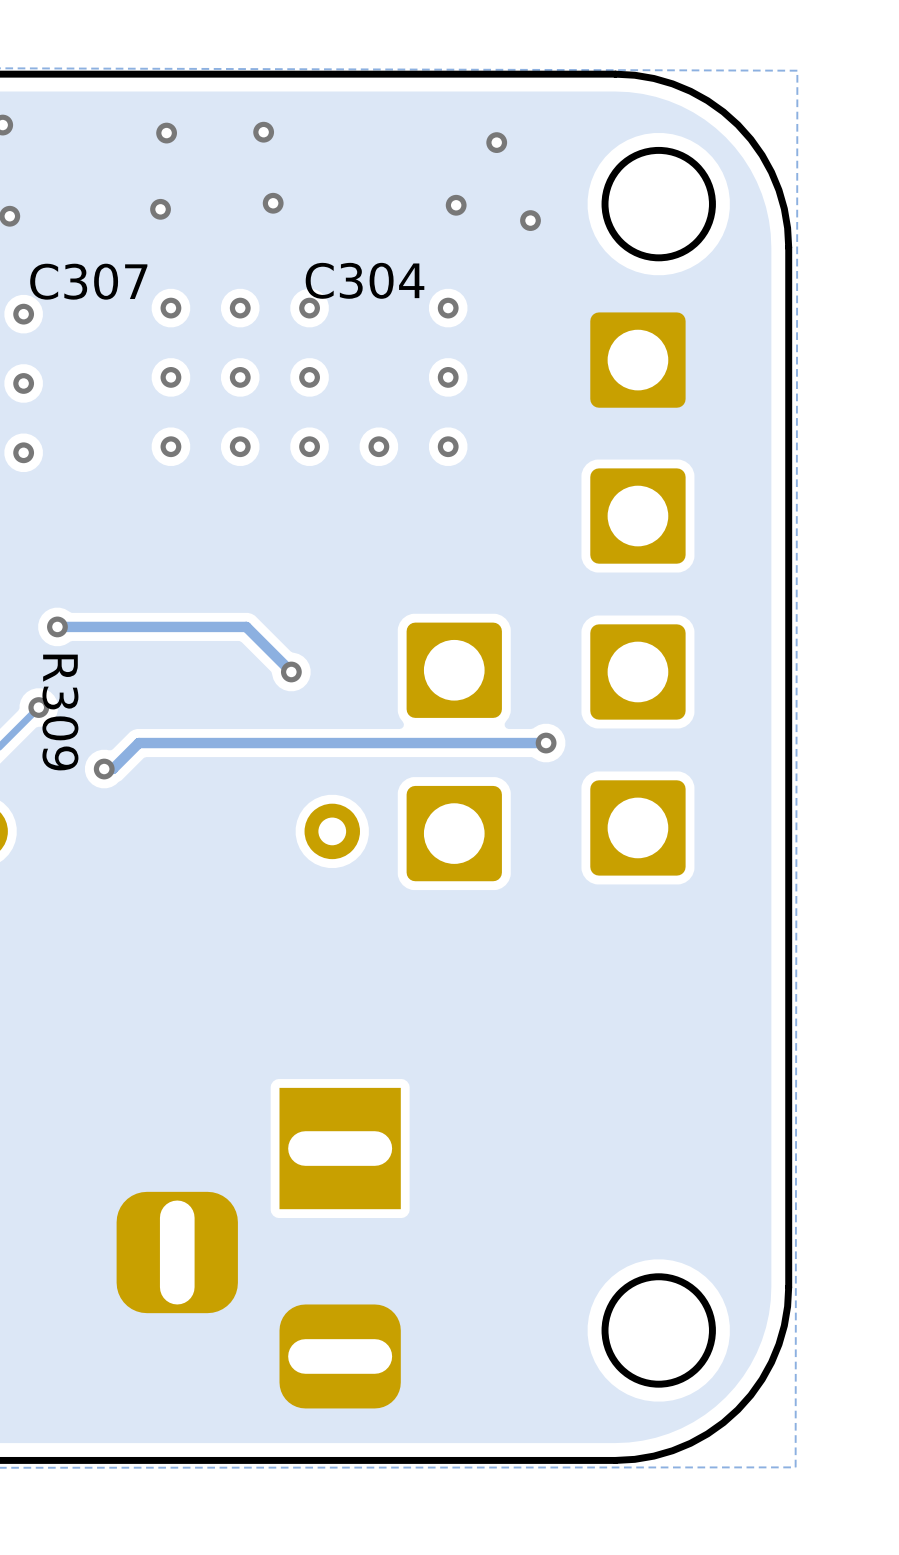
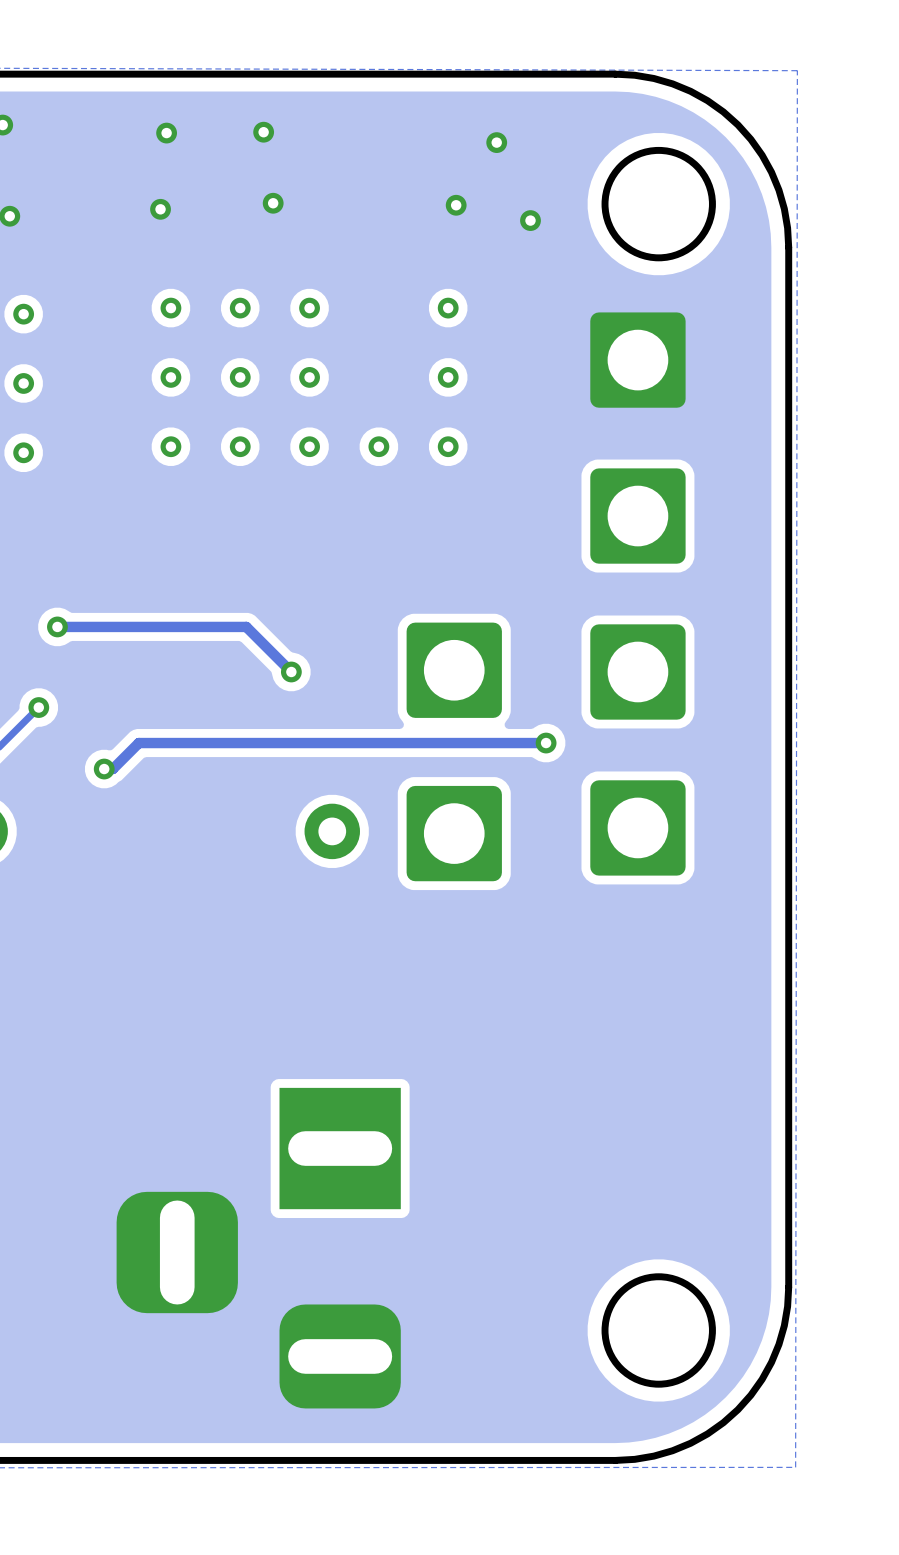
C304: (365, 280) -> none
C307: (88, 281) -> none
R309: (60, 712) -> none

